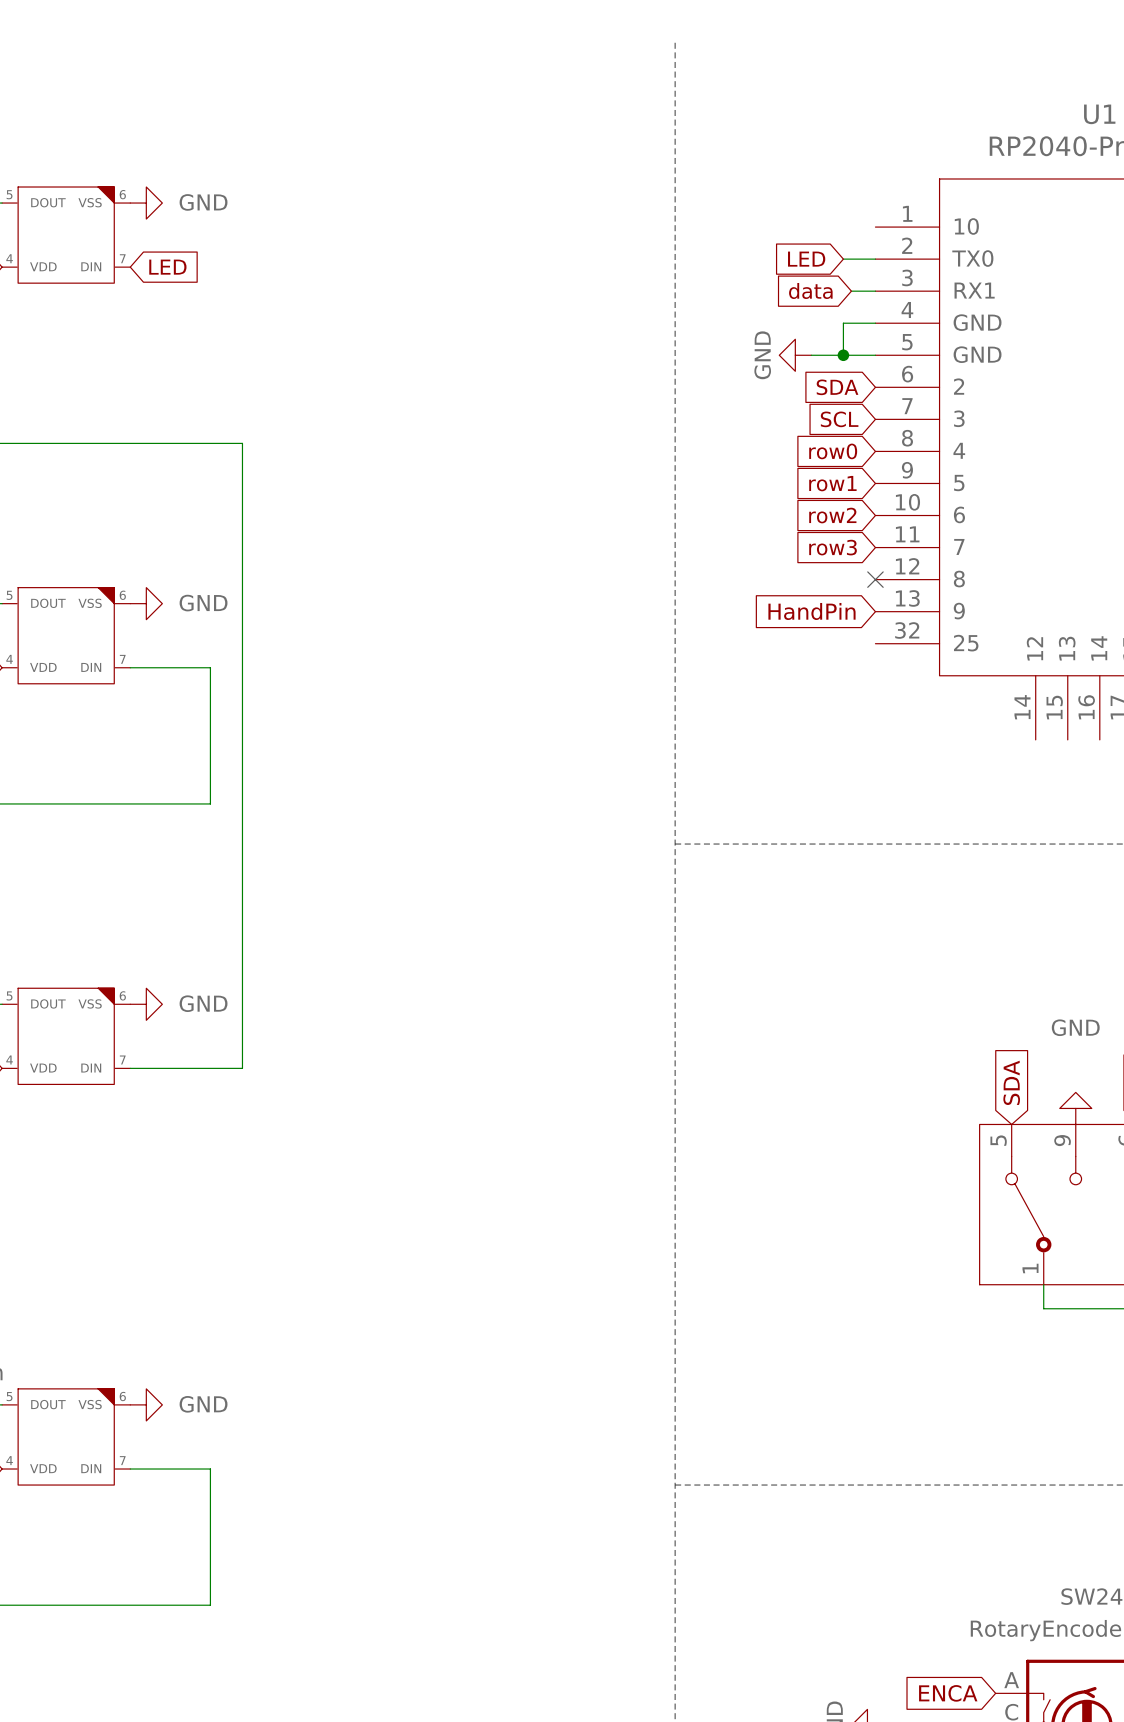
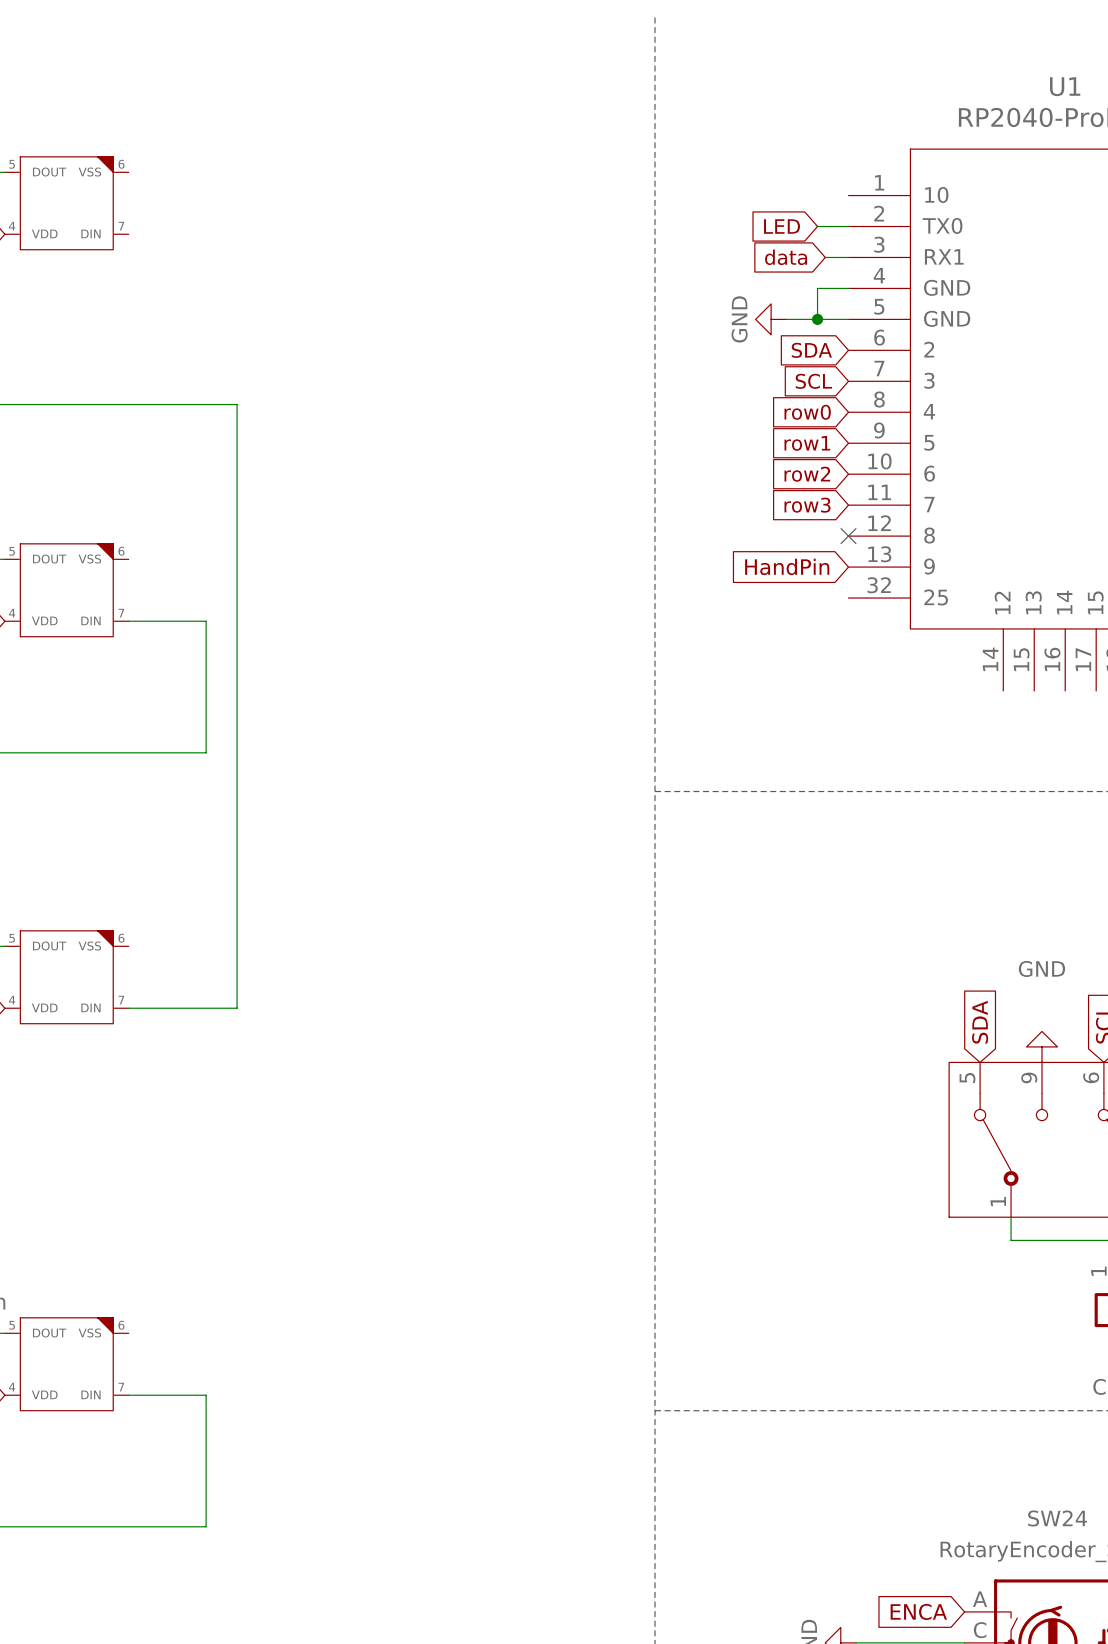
power symbol: GND (146, 203) -> none
global label: LED (167, 267) -> none
power symbol: GND (146, 603) -> none
power symbol: GND (146, 1004) -> none
power symbol: GND (146, 1404) -> none

